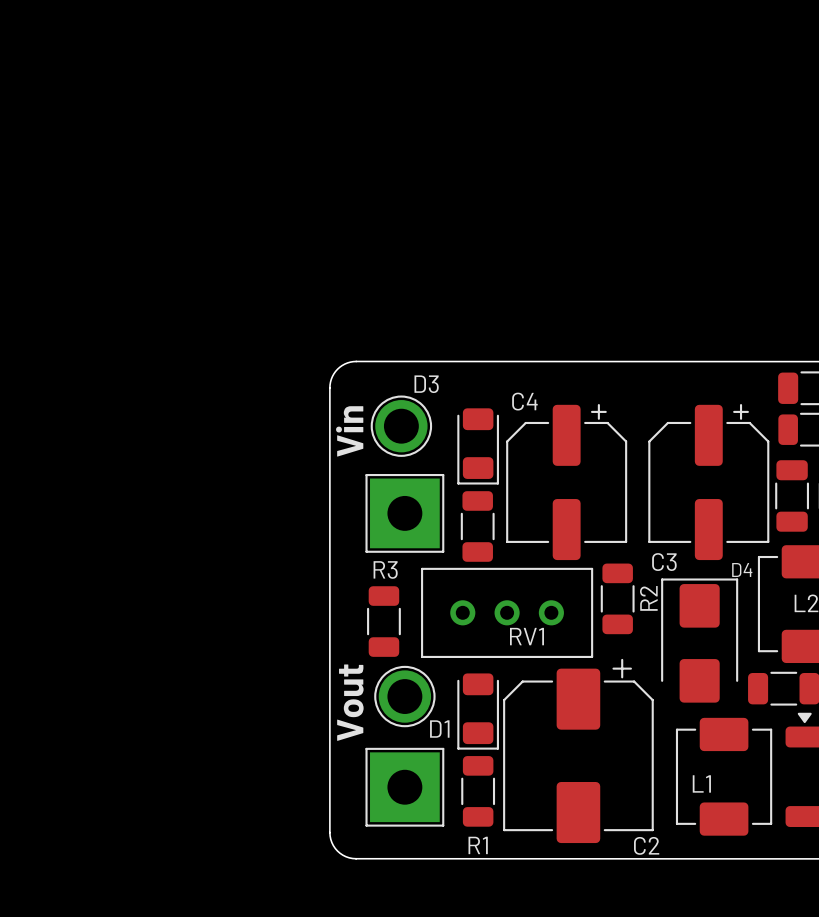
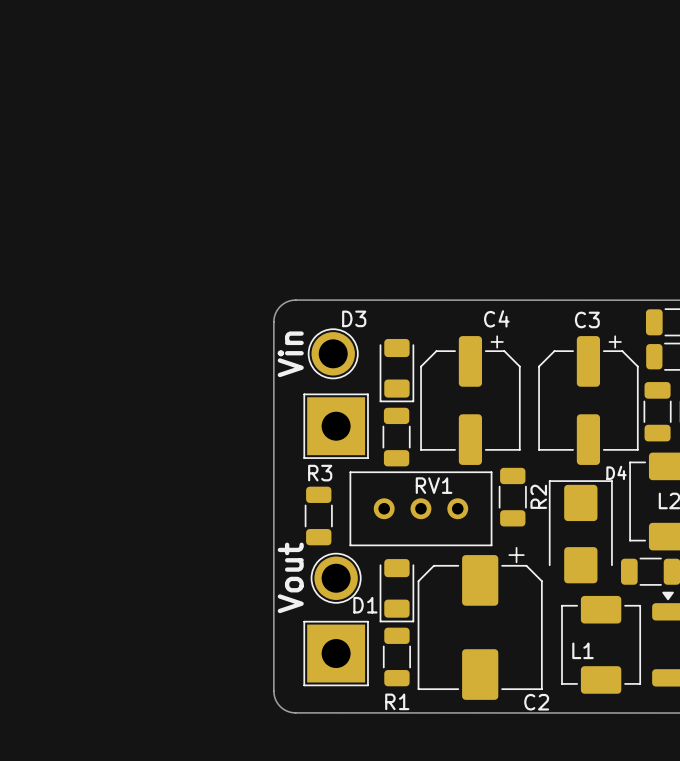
C4 name position: C4 (524, 401) -> C4 (496, 318)
C3 name position: C3 (664, 562) -> C3 (587, 319)
RV1 name position: RV1 (526, 636) -> RV1 (434, 485)

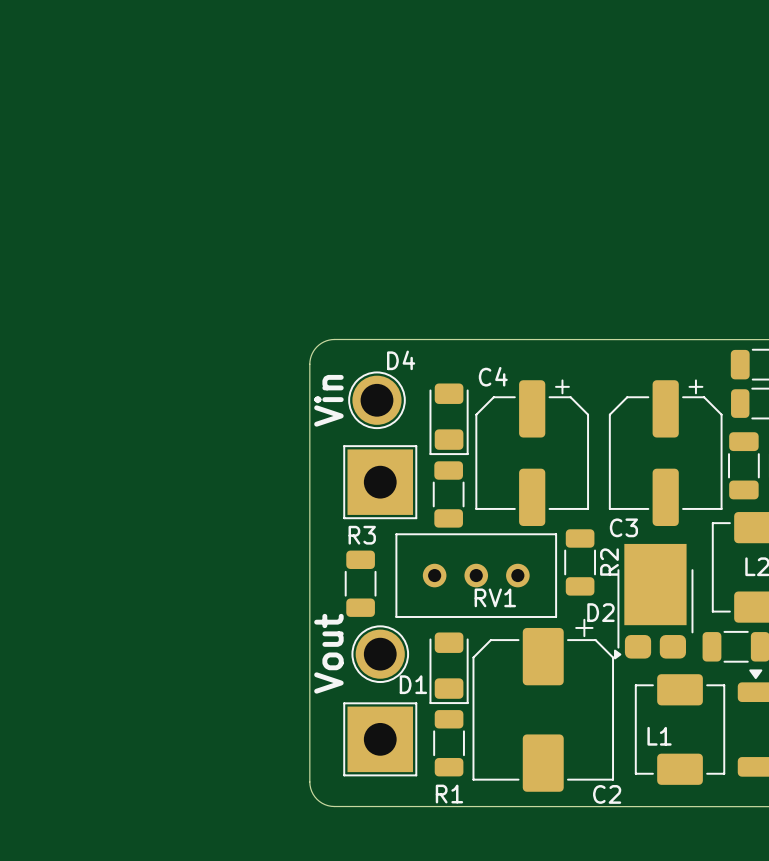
D3 name: D3 (354, 318) -> D4 (401, 360)
C4 name position: C4 (496, 318) -> C4 (493, 376)
C3 name position: C3 (587, 319) -> C3 (623, 527)
RV1 name position: RV1 (434, 485) -> RV1 (495, 597)
D2: none -> (653, 601)
D4: (580, 531) -> none

